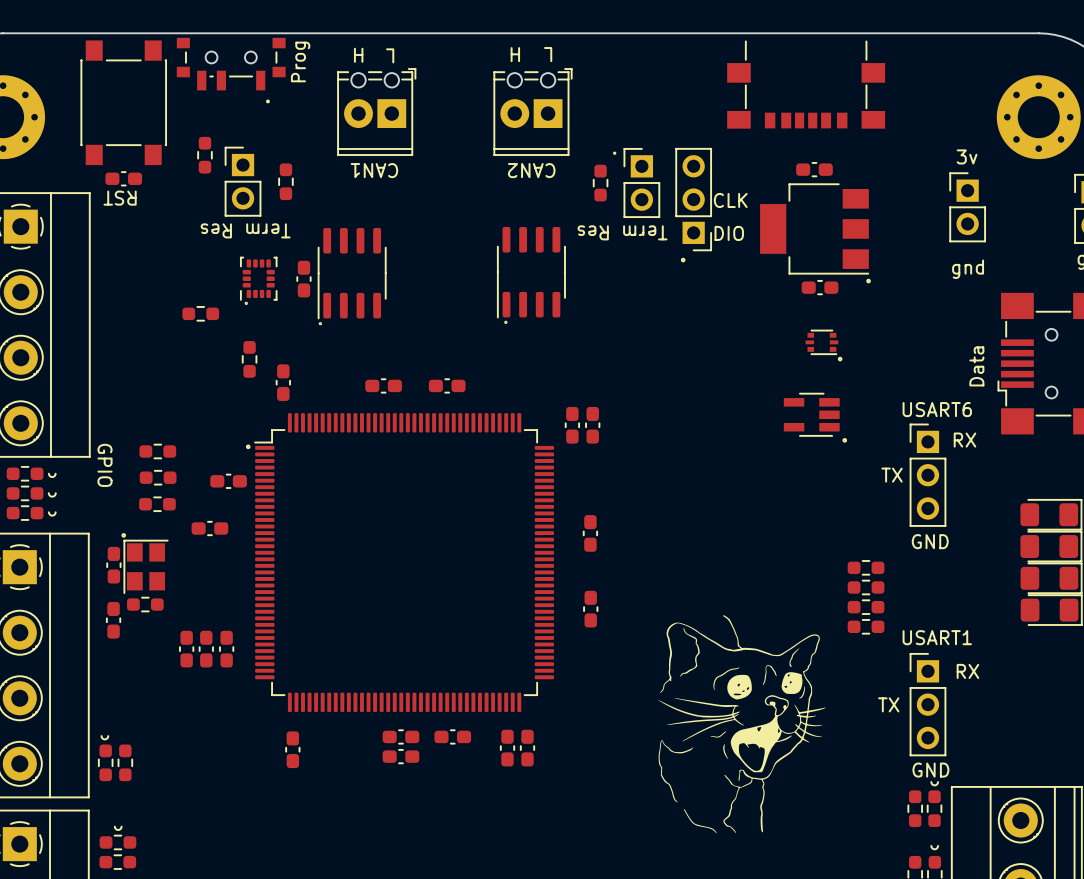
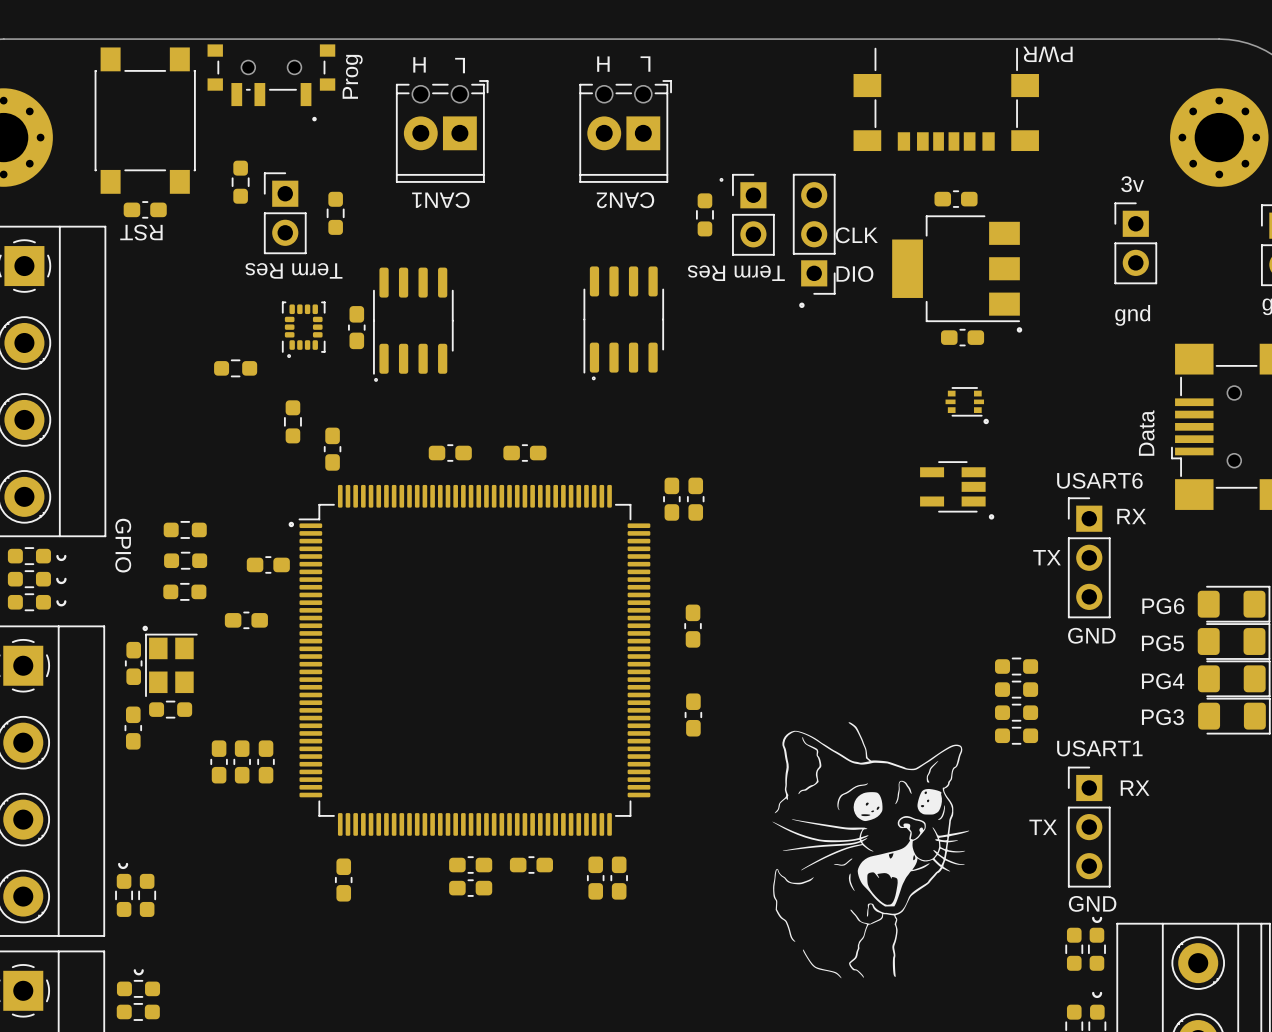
text: none -> PWR (1047, 54)
text: none -> PG6 (1163, 606)
text: none -> PG5 (1162, 643)
text: none -> PG4 (1163, 681)
text: none -> PG3 (1162, 717)

